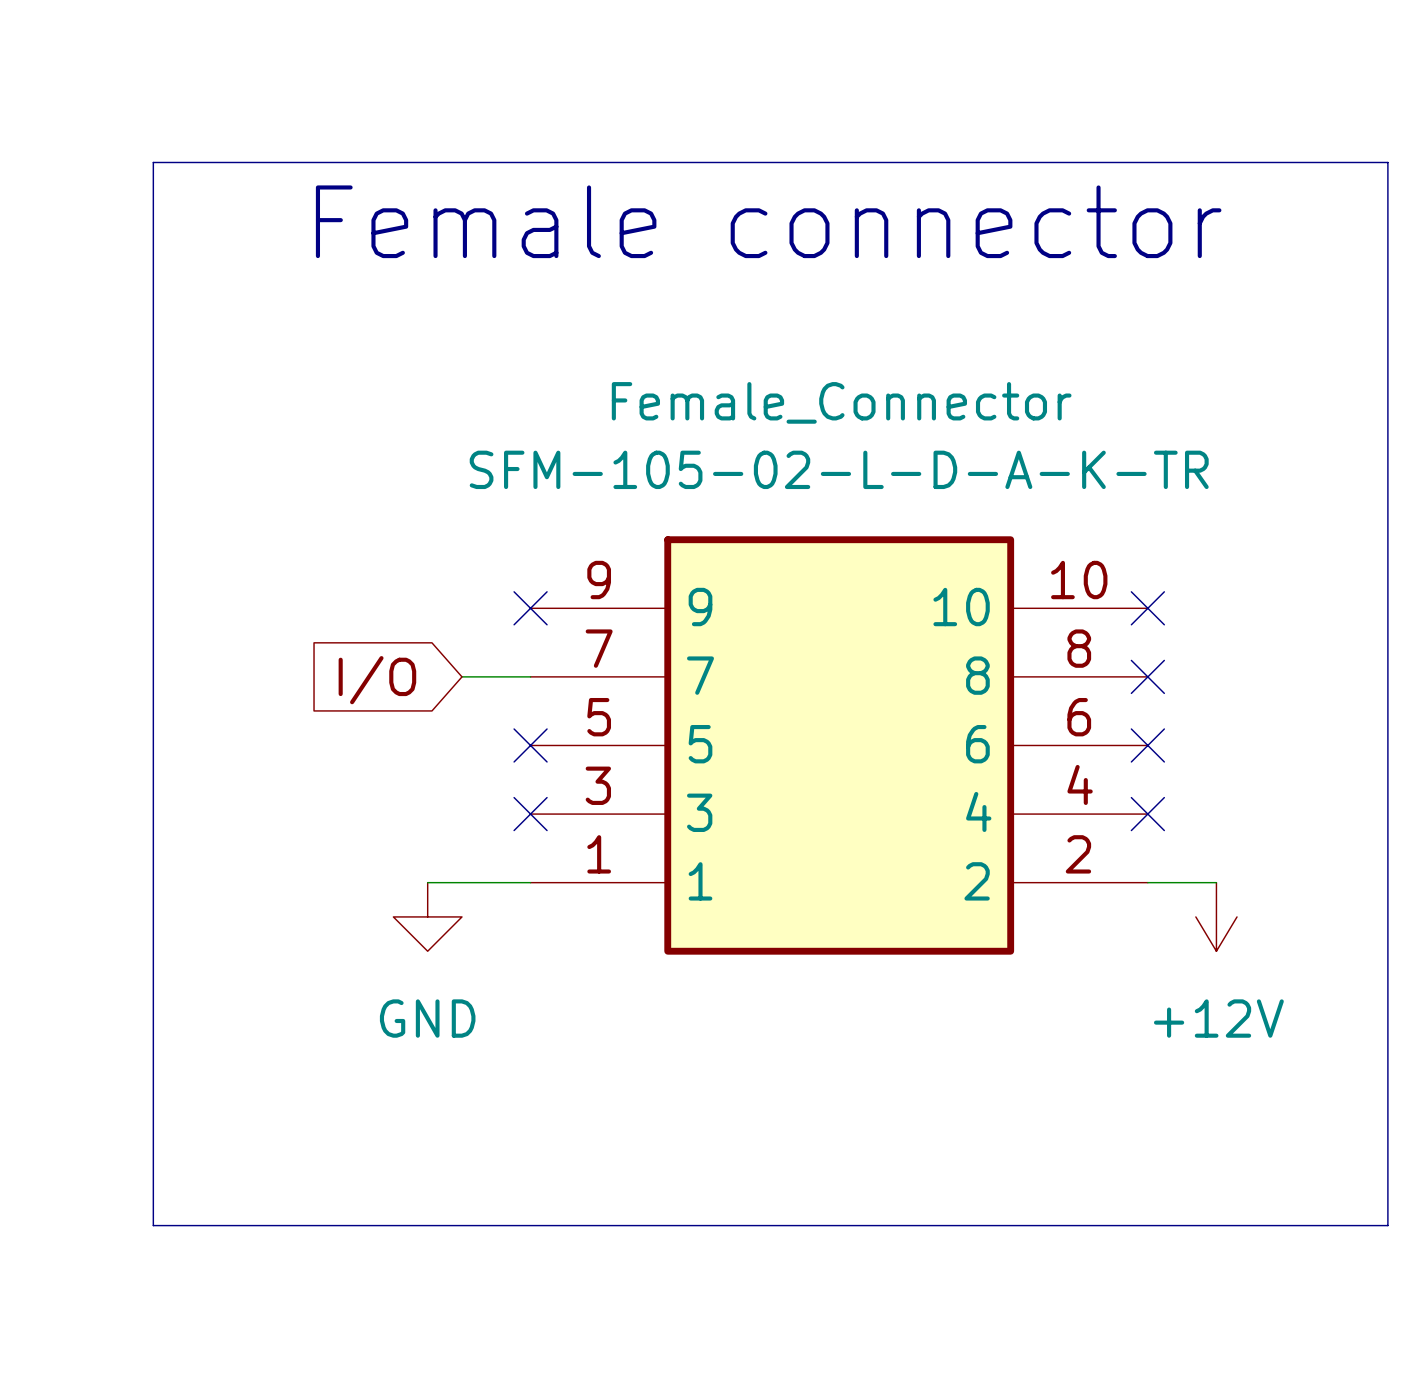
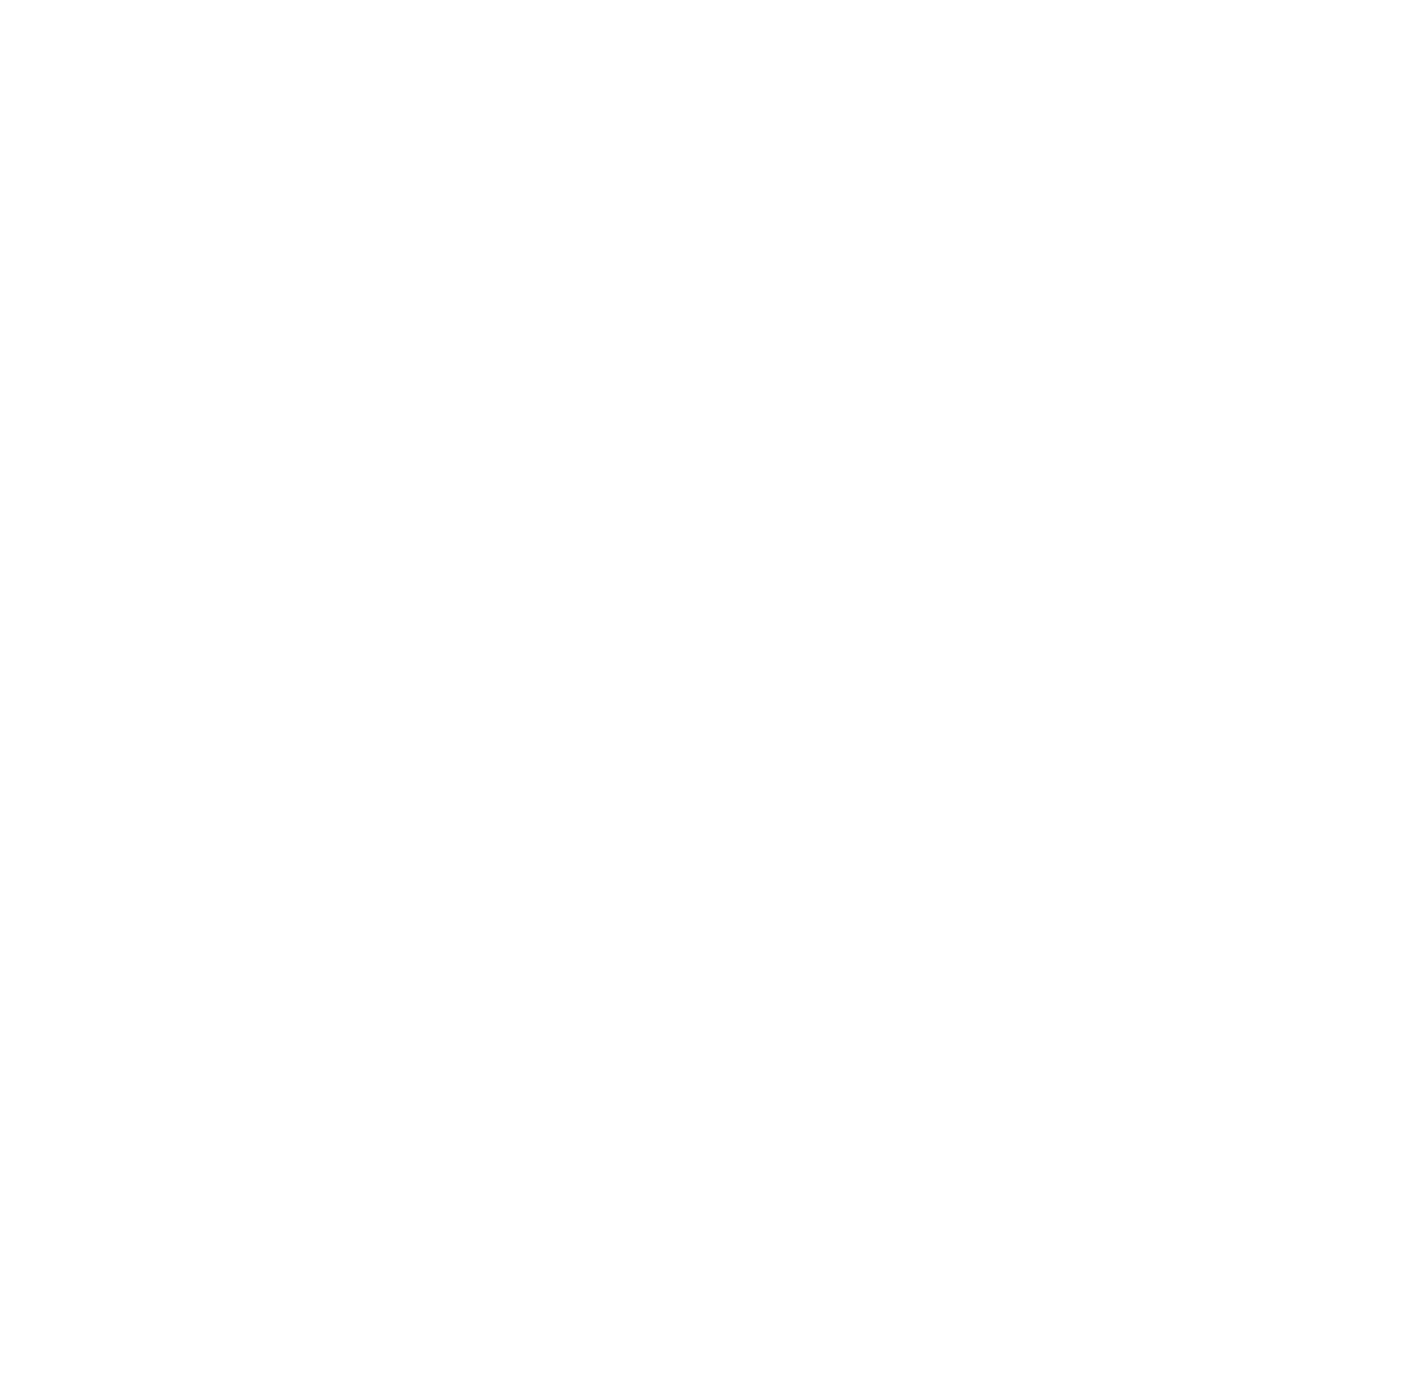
line: (153, 162) (1387, 162) (1387, 1225) (153, 1225) (153, 162) -> none
text: Female connector (768, 221) -> none
no-connect mark: (530, 608) -> none
no-connect mark: (1147, 608) -> none
wire: (461, 676) (530, 676) -> none
no-connect mark: (1147, 676) -> none
global label: I/O (377, 680) -> none
no-connect mark: (530, 745) -> none
Female_Connector: SFM-105-02-L-D-A-K-TR (839, 745) -> none
no-connect mark: (1147, 745) -> none
no-connect mark: (530, 814) -> none
no-connect mark: (1147, 814) -> none
wire: (427, 882) (530, 882) -> none
wire: (1147, 882) (1216, 882) -> none
power symbol: GND (427, 916) -> none
power symbol: +12V (1216, 916) -> none

